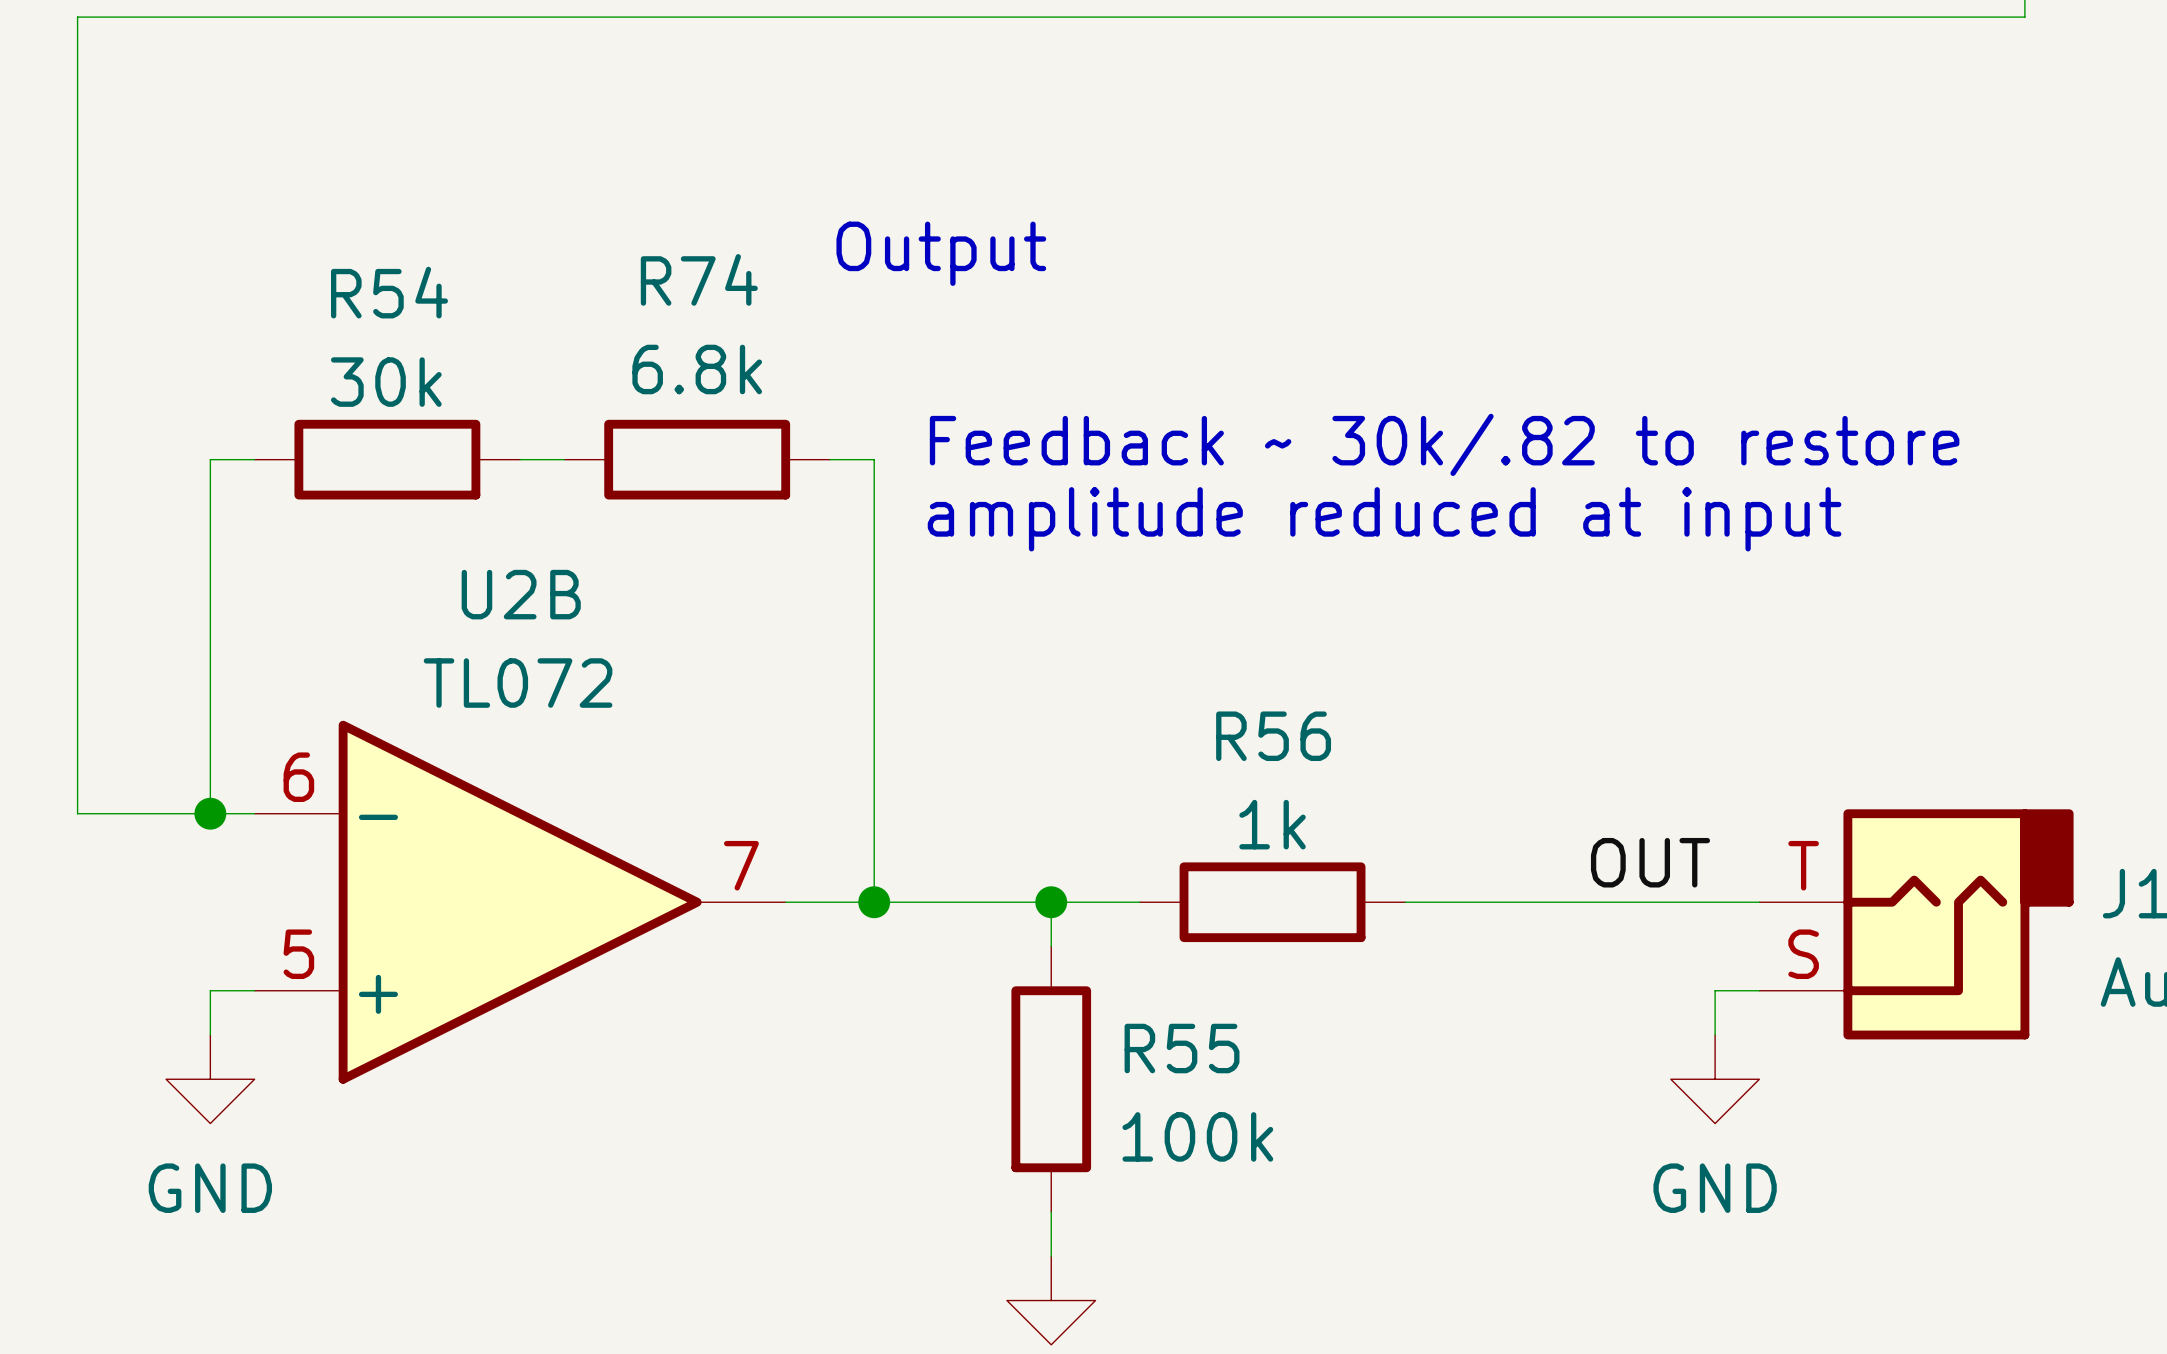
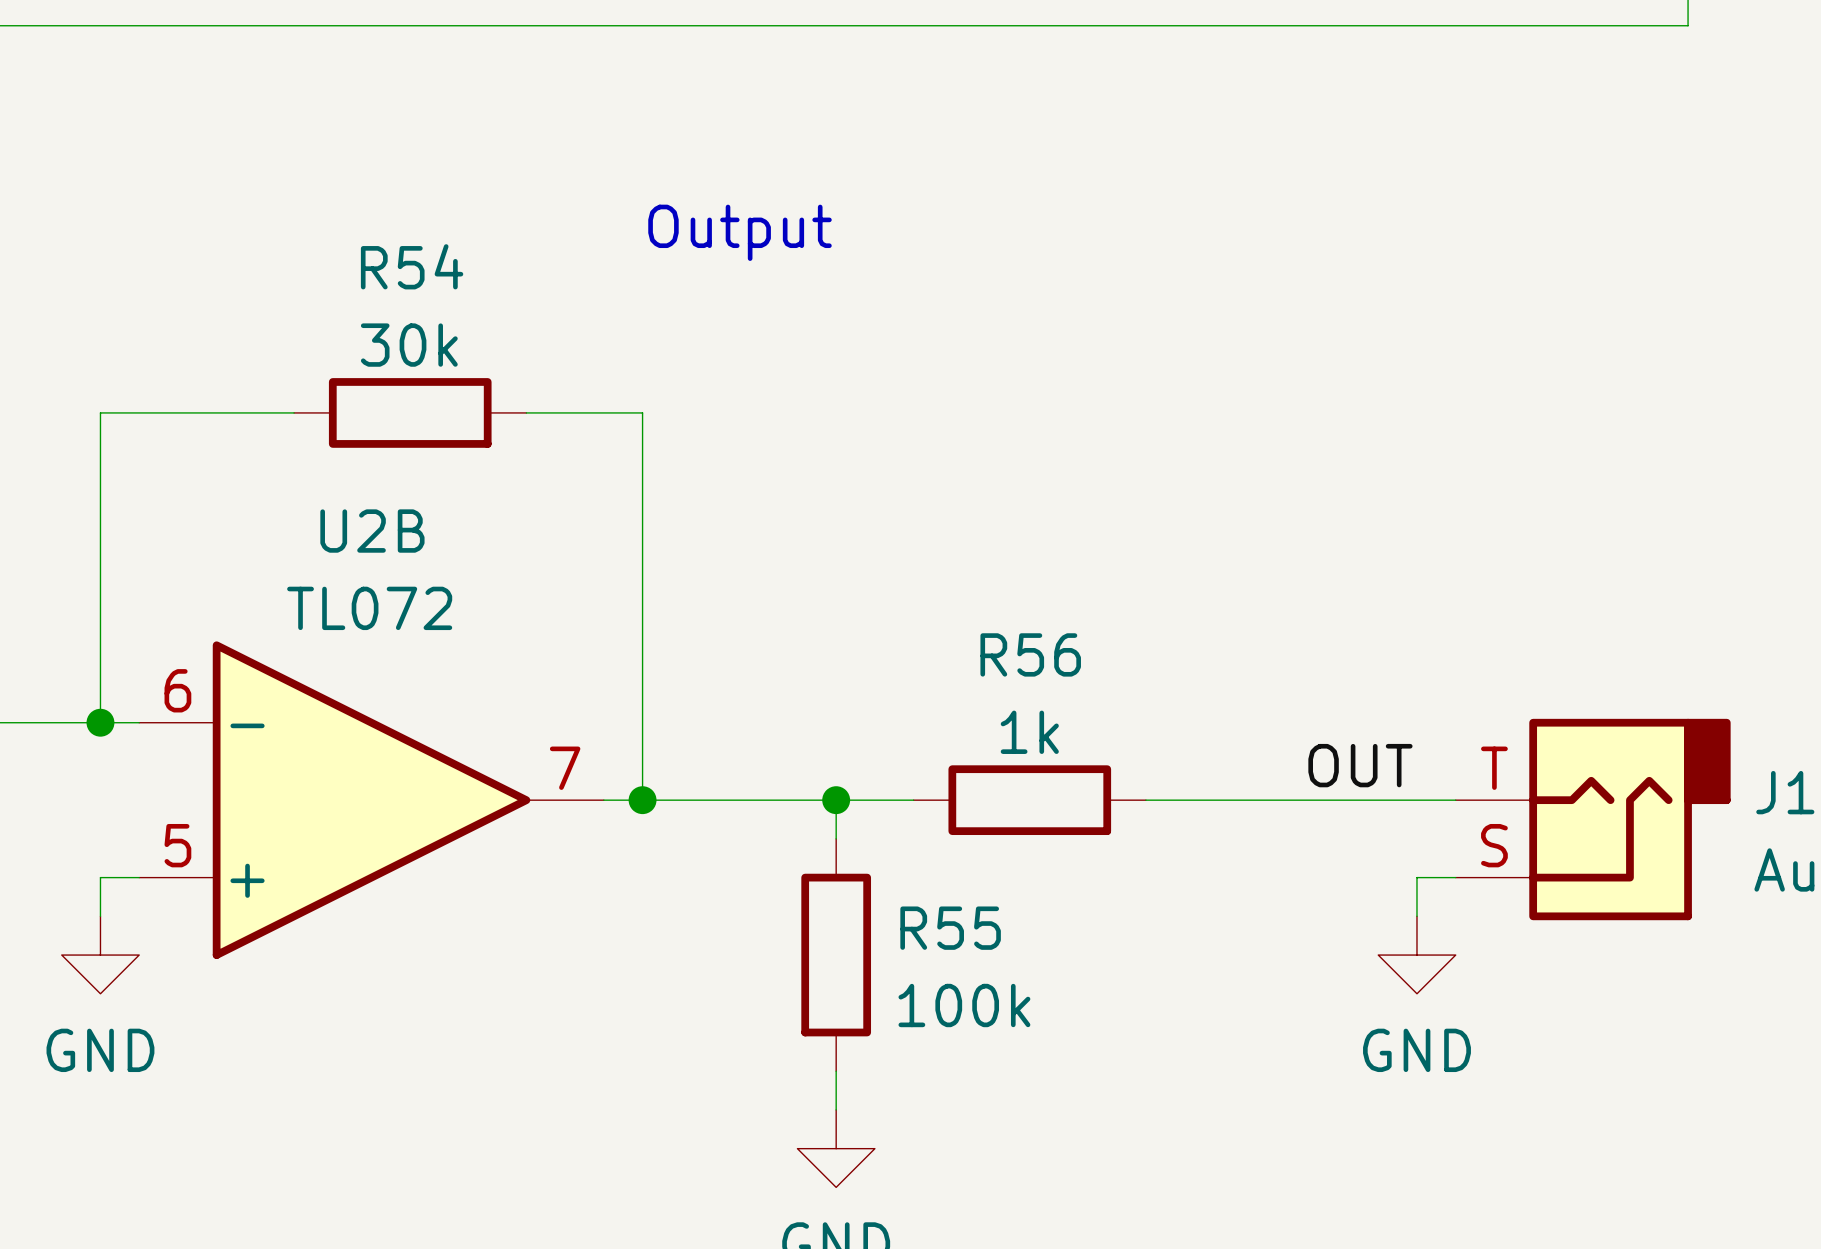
text: Feedback ~ 30k/.82 to restore (1444, 444) -> none
wire: none -> (139, 412) (294, 412)
R54 position: (387, 459) -> (410, 412)
wire: (520, 459) (564, 459) -> none
wire: none -> (526, 412) (642, 412) (642, 800)
R74: 6.8k (697, 459) -> none
wire: (829, 459) (874, 459) (874, 902) -> none
text: amplitude reduced at input (1384, 519) -> none
junction position: (874, 902) -> (642, 800)

